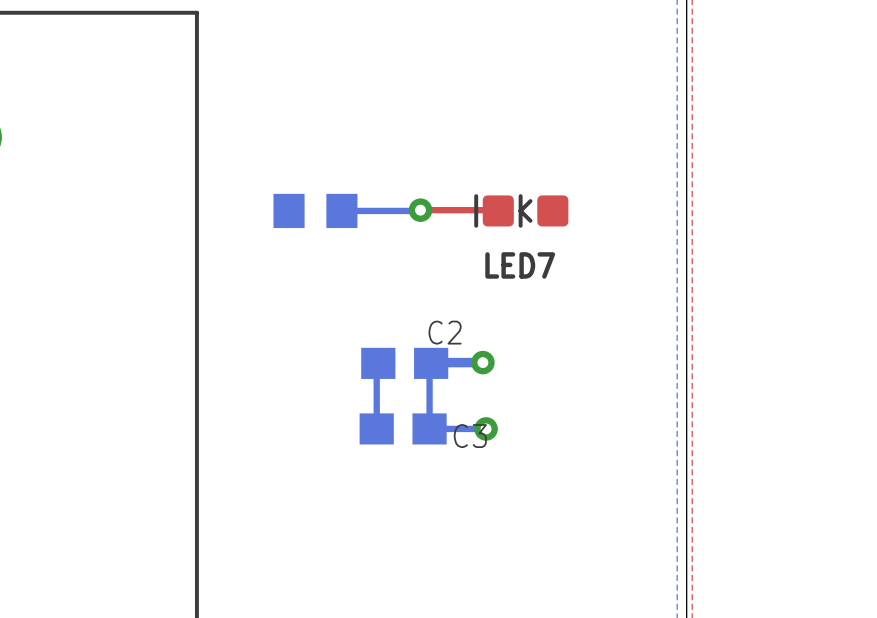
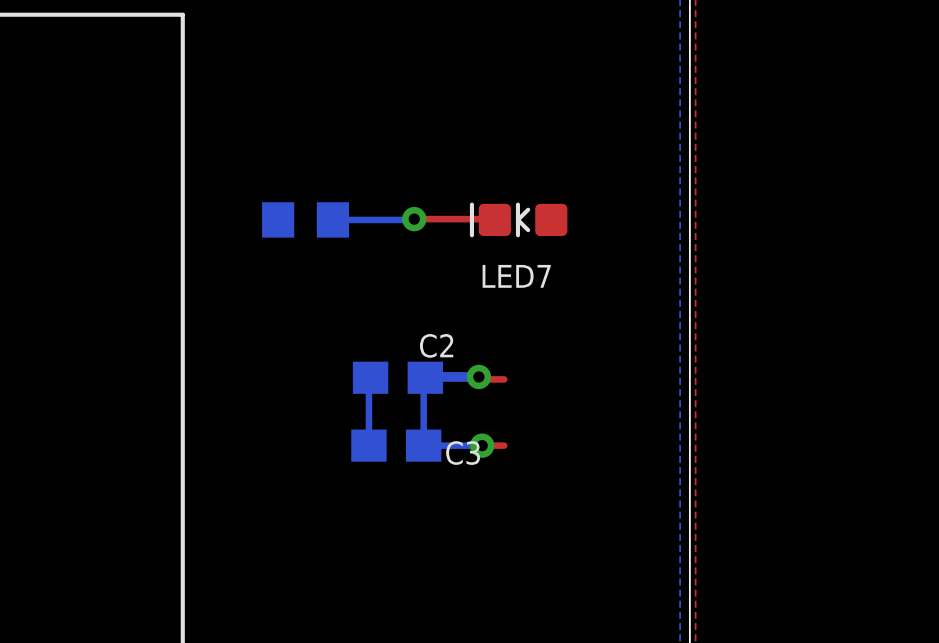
top track: none -> (481, 379) (504, 379)
top track: none -> (482, 445) (504, 445)

